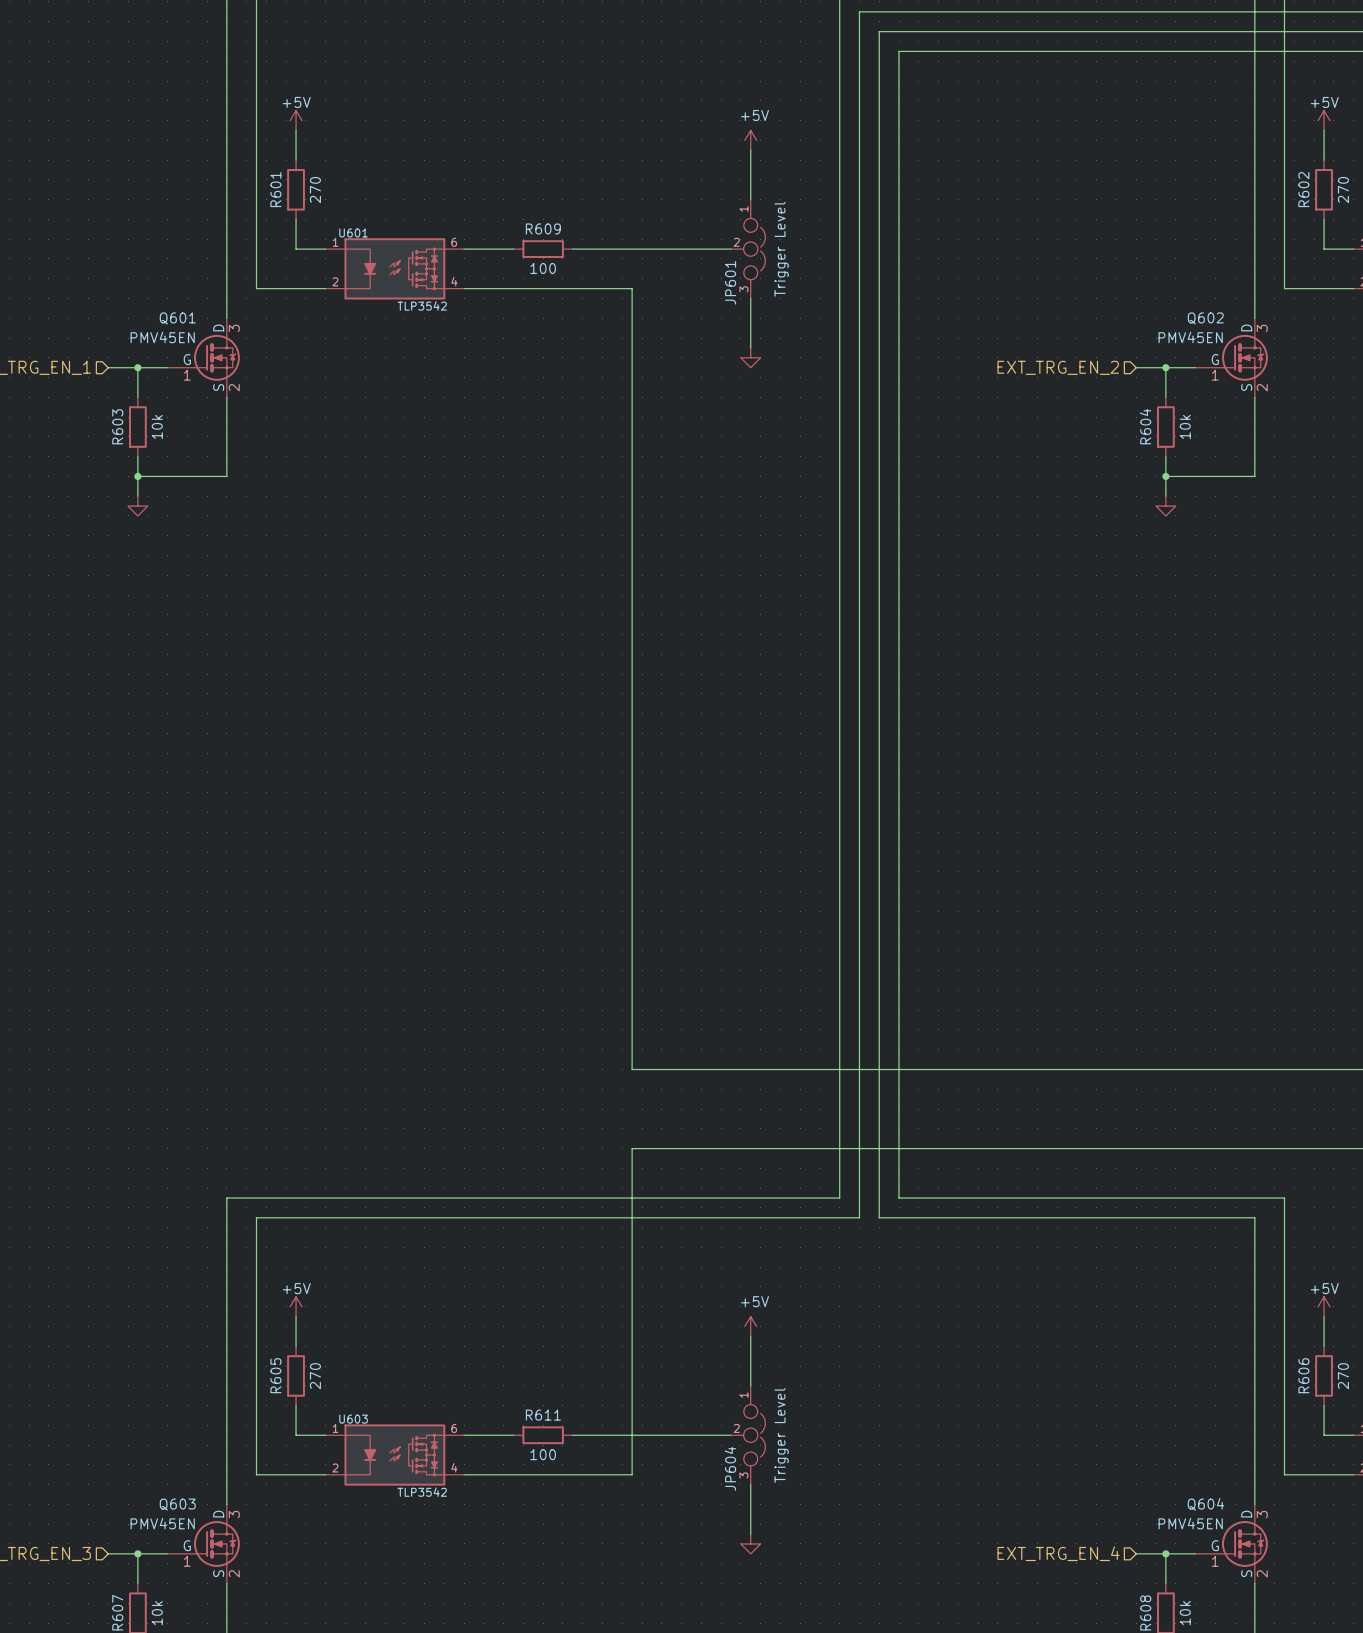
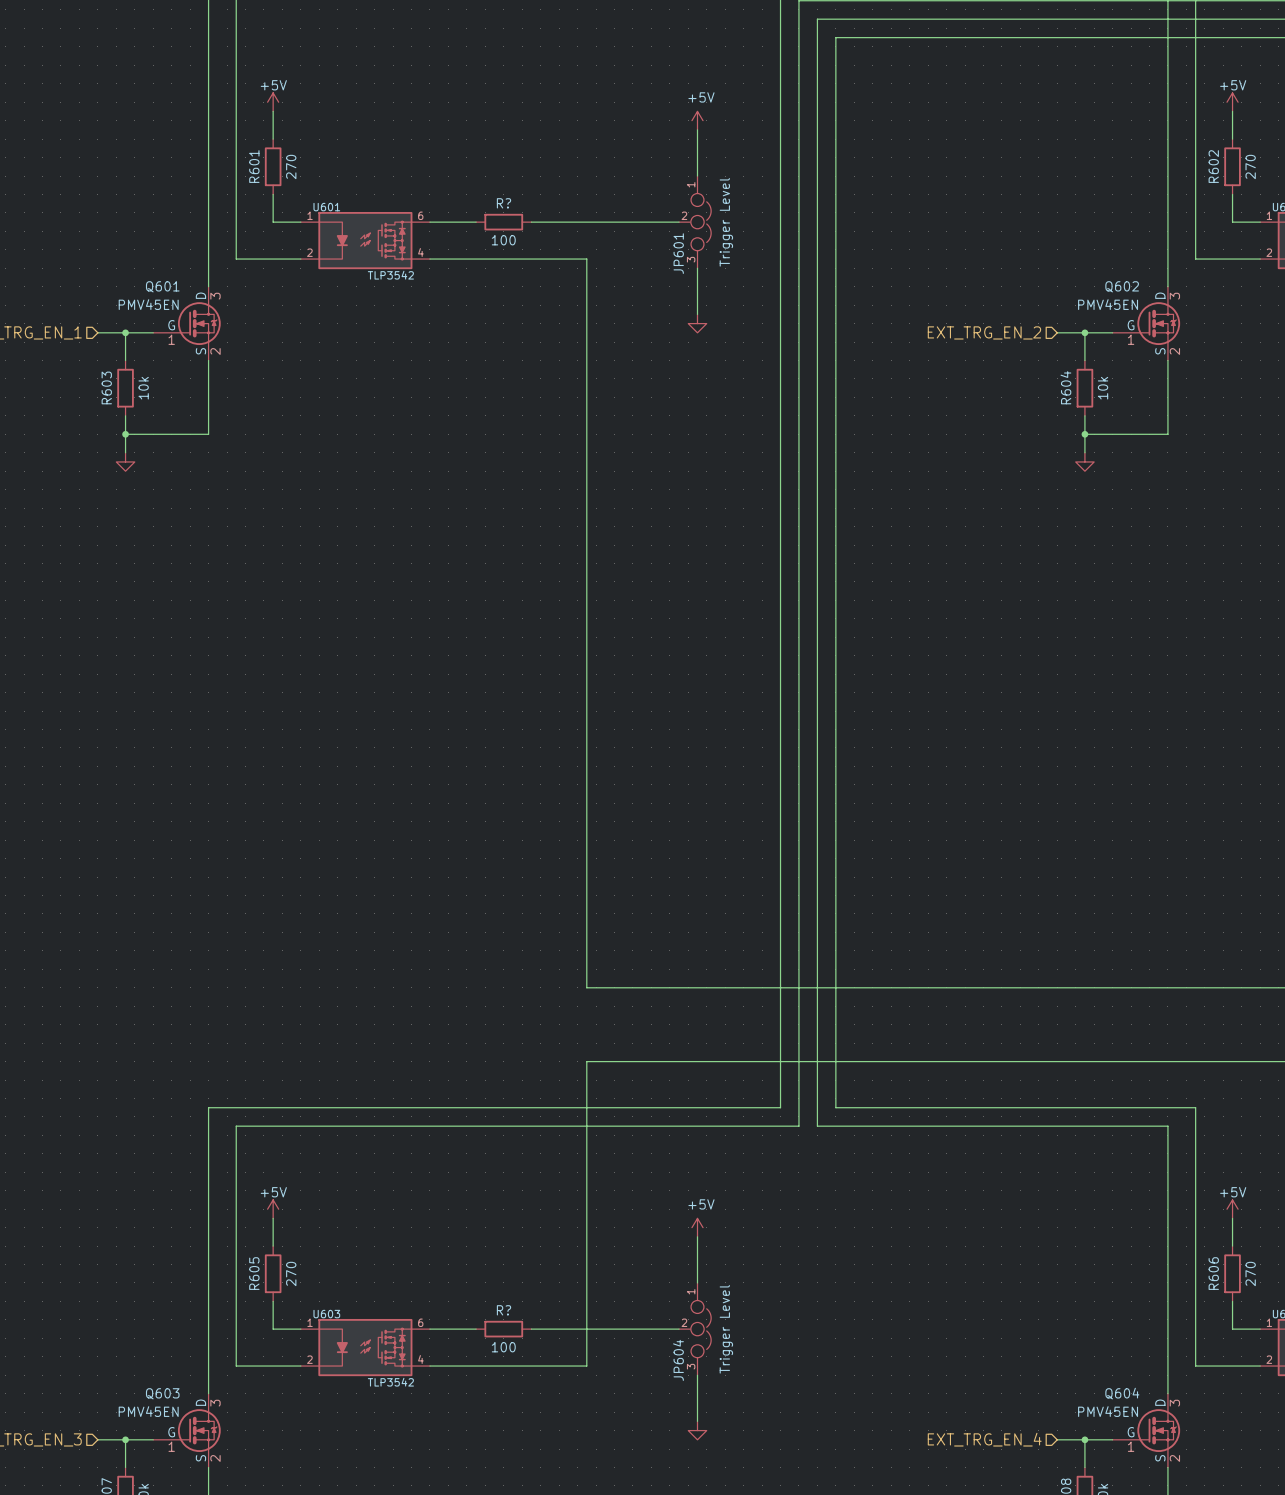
R609 name: R609 (543, 228) -> R? (503, 203)
R611 name: R611 (543, 1415) -> R? (503, 1310)

